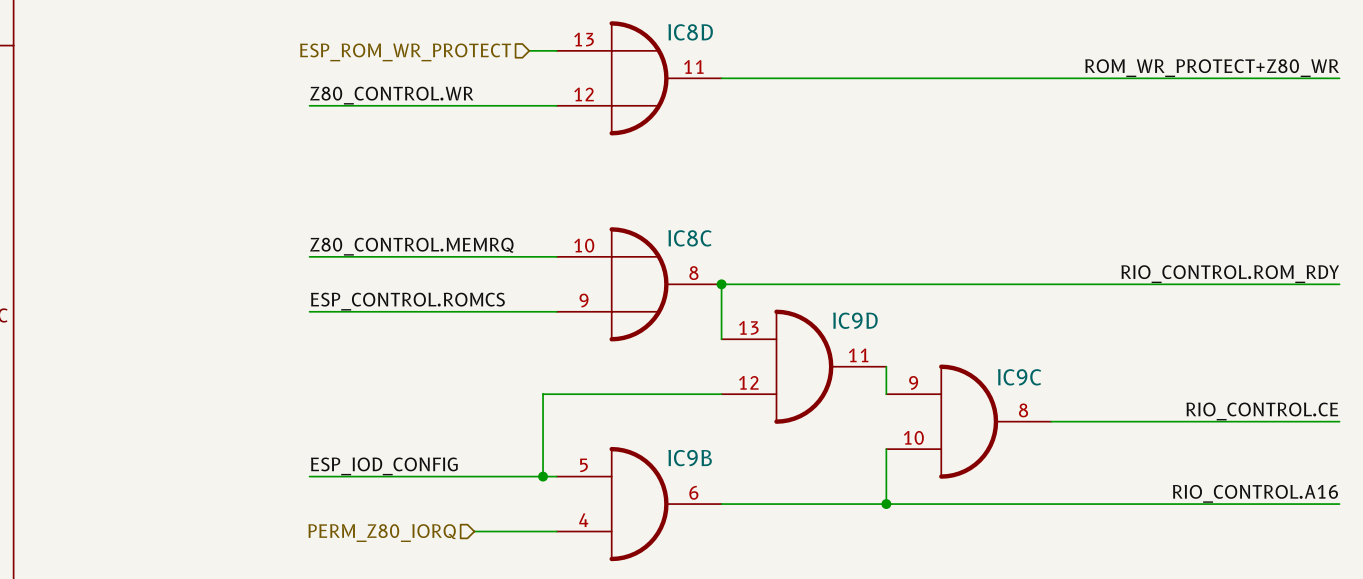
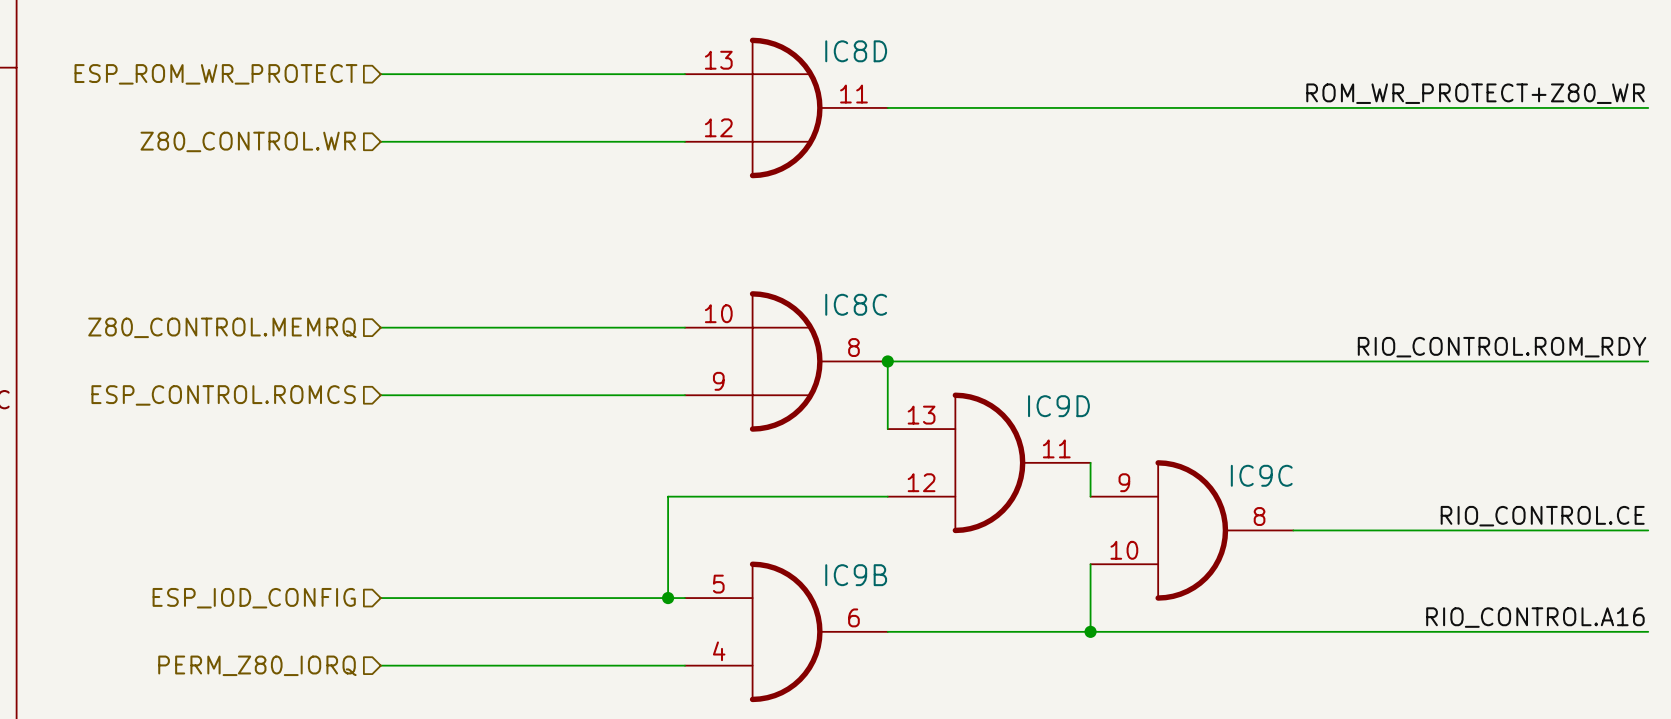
wire: none -> (380, 74) (651, 74)
hierarchical label position: ESP_ROM_WR_PROTECT (405, 52) -> ESP_ROM_WR_PROTECT (215, 74)
label: Z80_CONTROL.WR (391, 95) -> none
hierarchical label: none -> Z80_CONTROL.WR (248, 141)
label: Z80_CONTROL.MEMRQ (411, 246) -> none
hierarchical label: none -> Z80_CONTROL.MEMRQ (222, 327)
label: ESP_CONTROL.ROMCS (407, 301) -> none
hierarchical label: none -> ESP_CONTROL.ROMCS (223, 395)
label: ESP_IOD_CONFIG (384, 466) -> none
hierarchical label: none -> ESP_IOD_CONFIG (254, 598)
wire: none -> (380, 665) (583, 665)
hierarchical label position: PERM_Z80_IORQ (382, 533) -> PERM_Z80_IORQ (257, 665)

